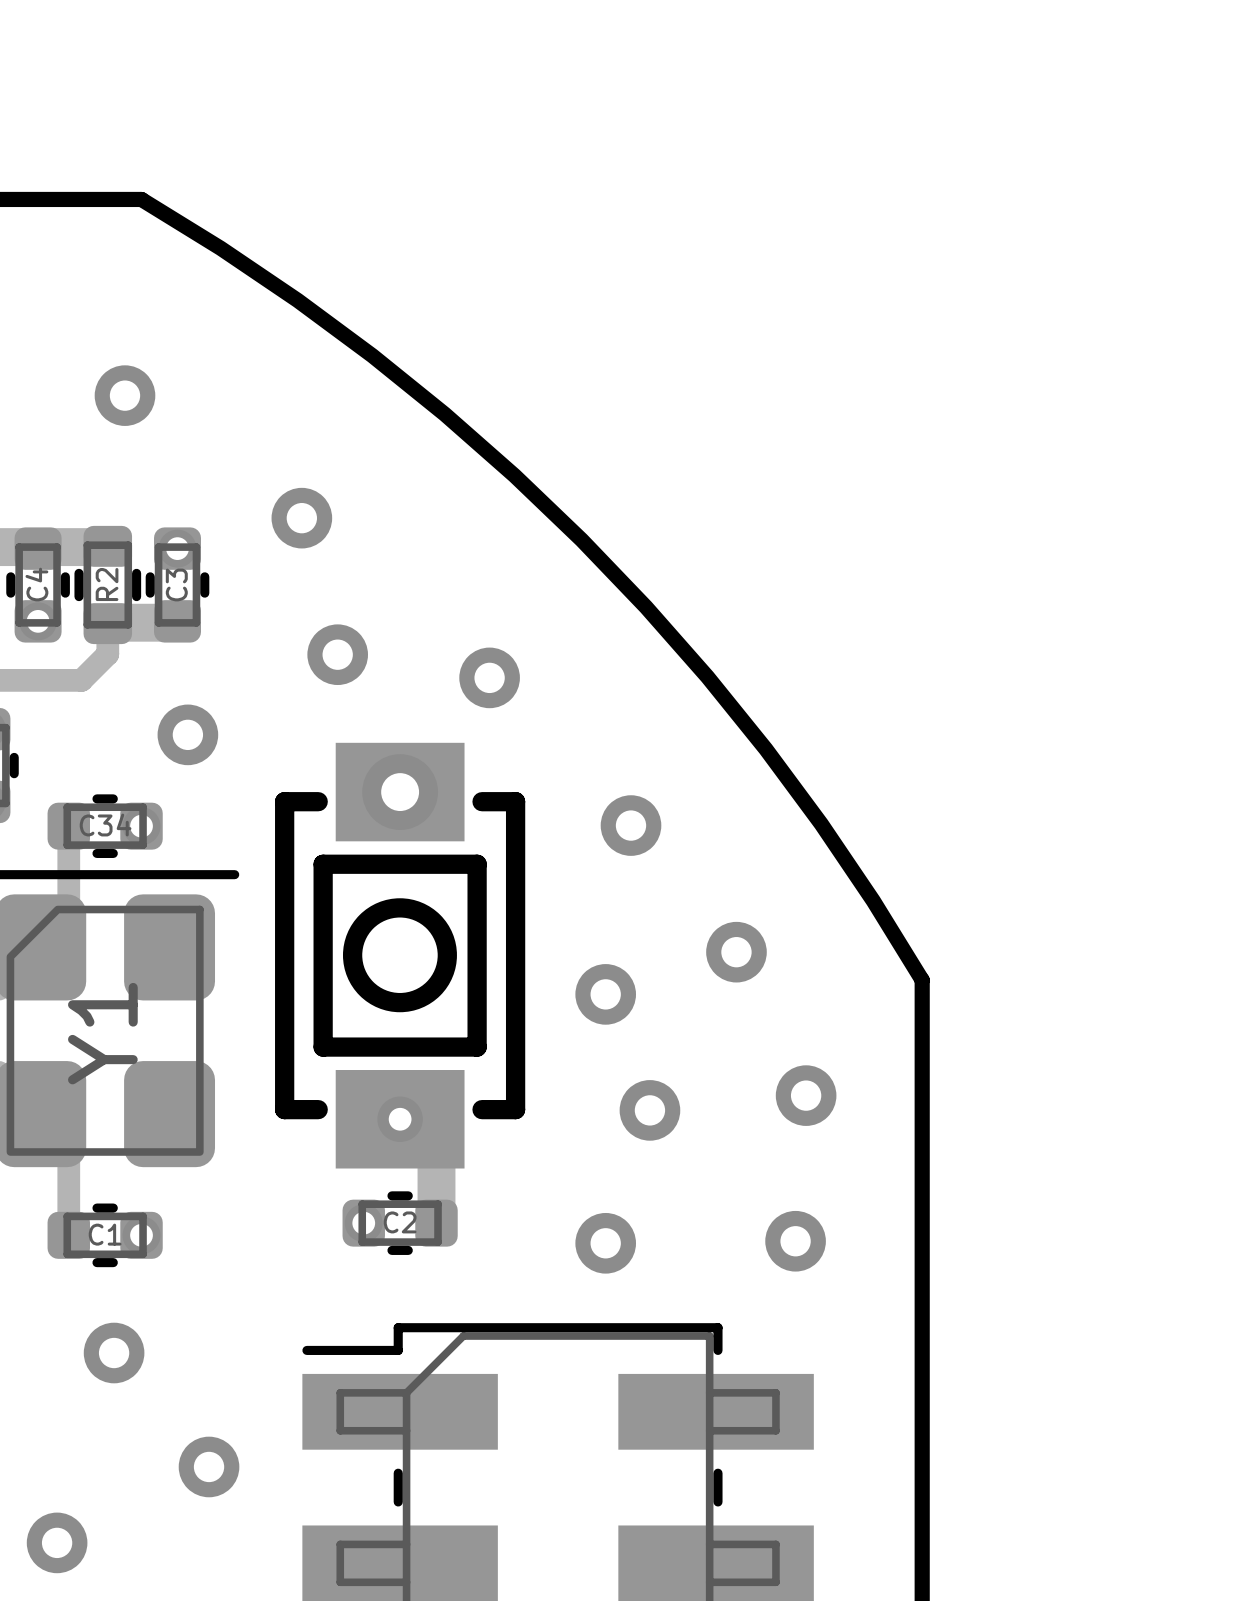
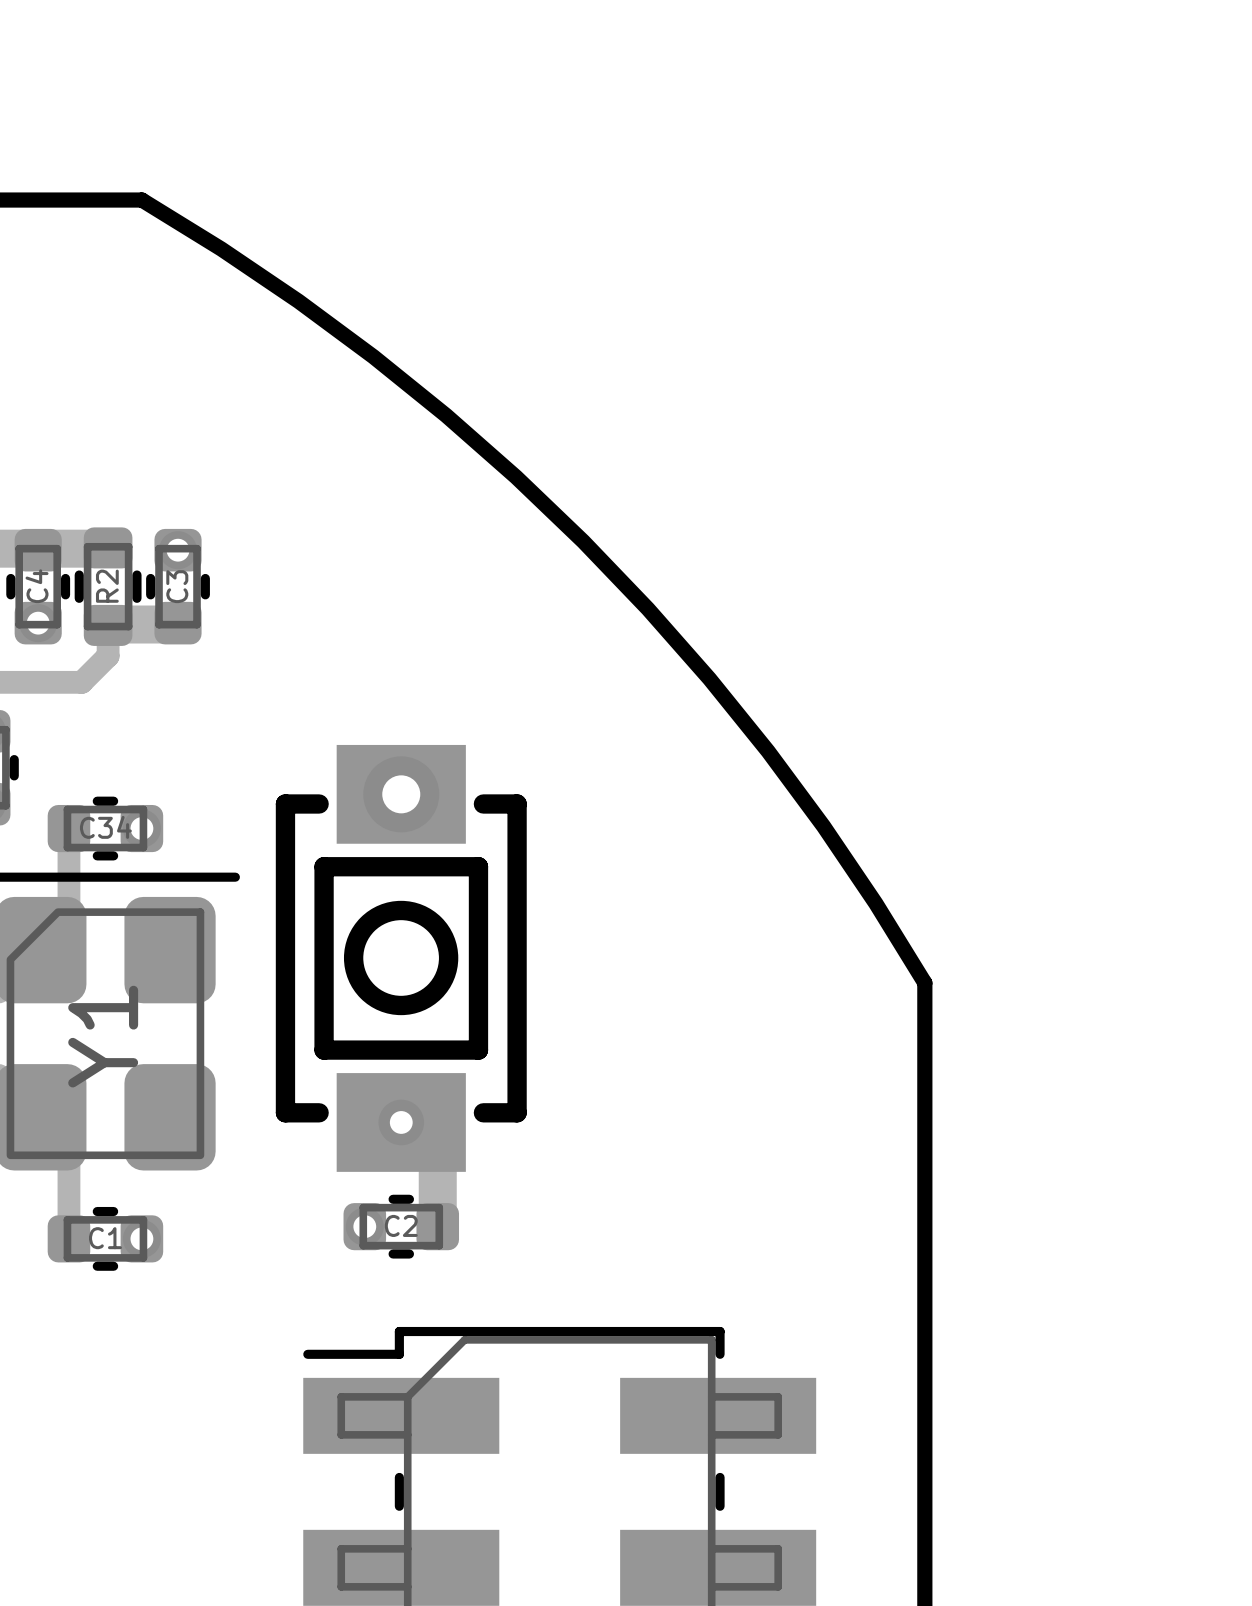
via: (124, 395) -> none
via: (301, 518) -> none
via: (337, 654) -> none
via: (489, 677) -> none
via: (187, 734) -> none
via: (631, 825) -> none
via: (736, 952) -> none
via: (605, 994) -> none
via: (806, 1095) -> none
via: (649, 1110) -> none
via: (795, 1241) -> none
via: (605, 1243) -> none
via: (114, 1353) -> none
via: (209, 1466) -> none
via: (57, 1542) -> none

